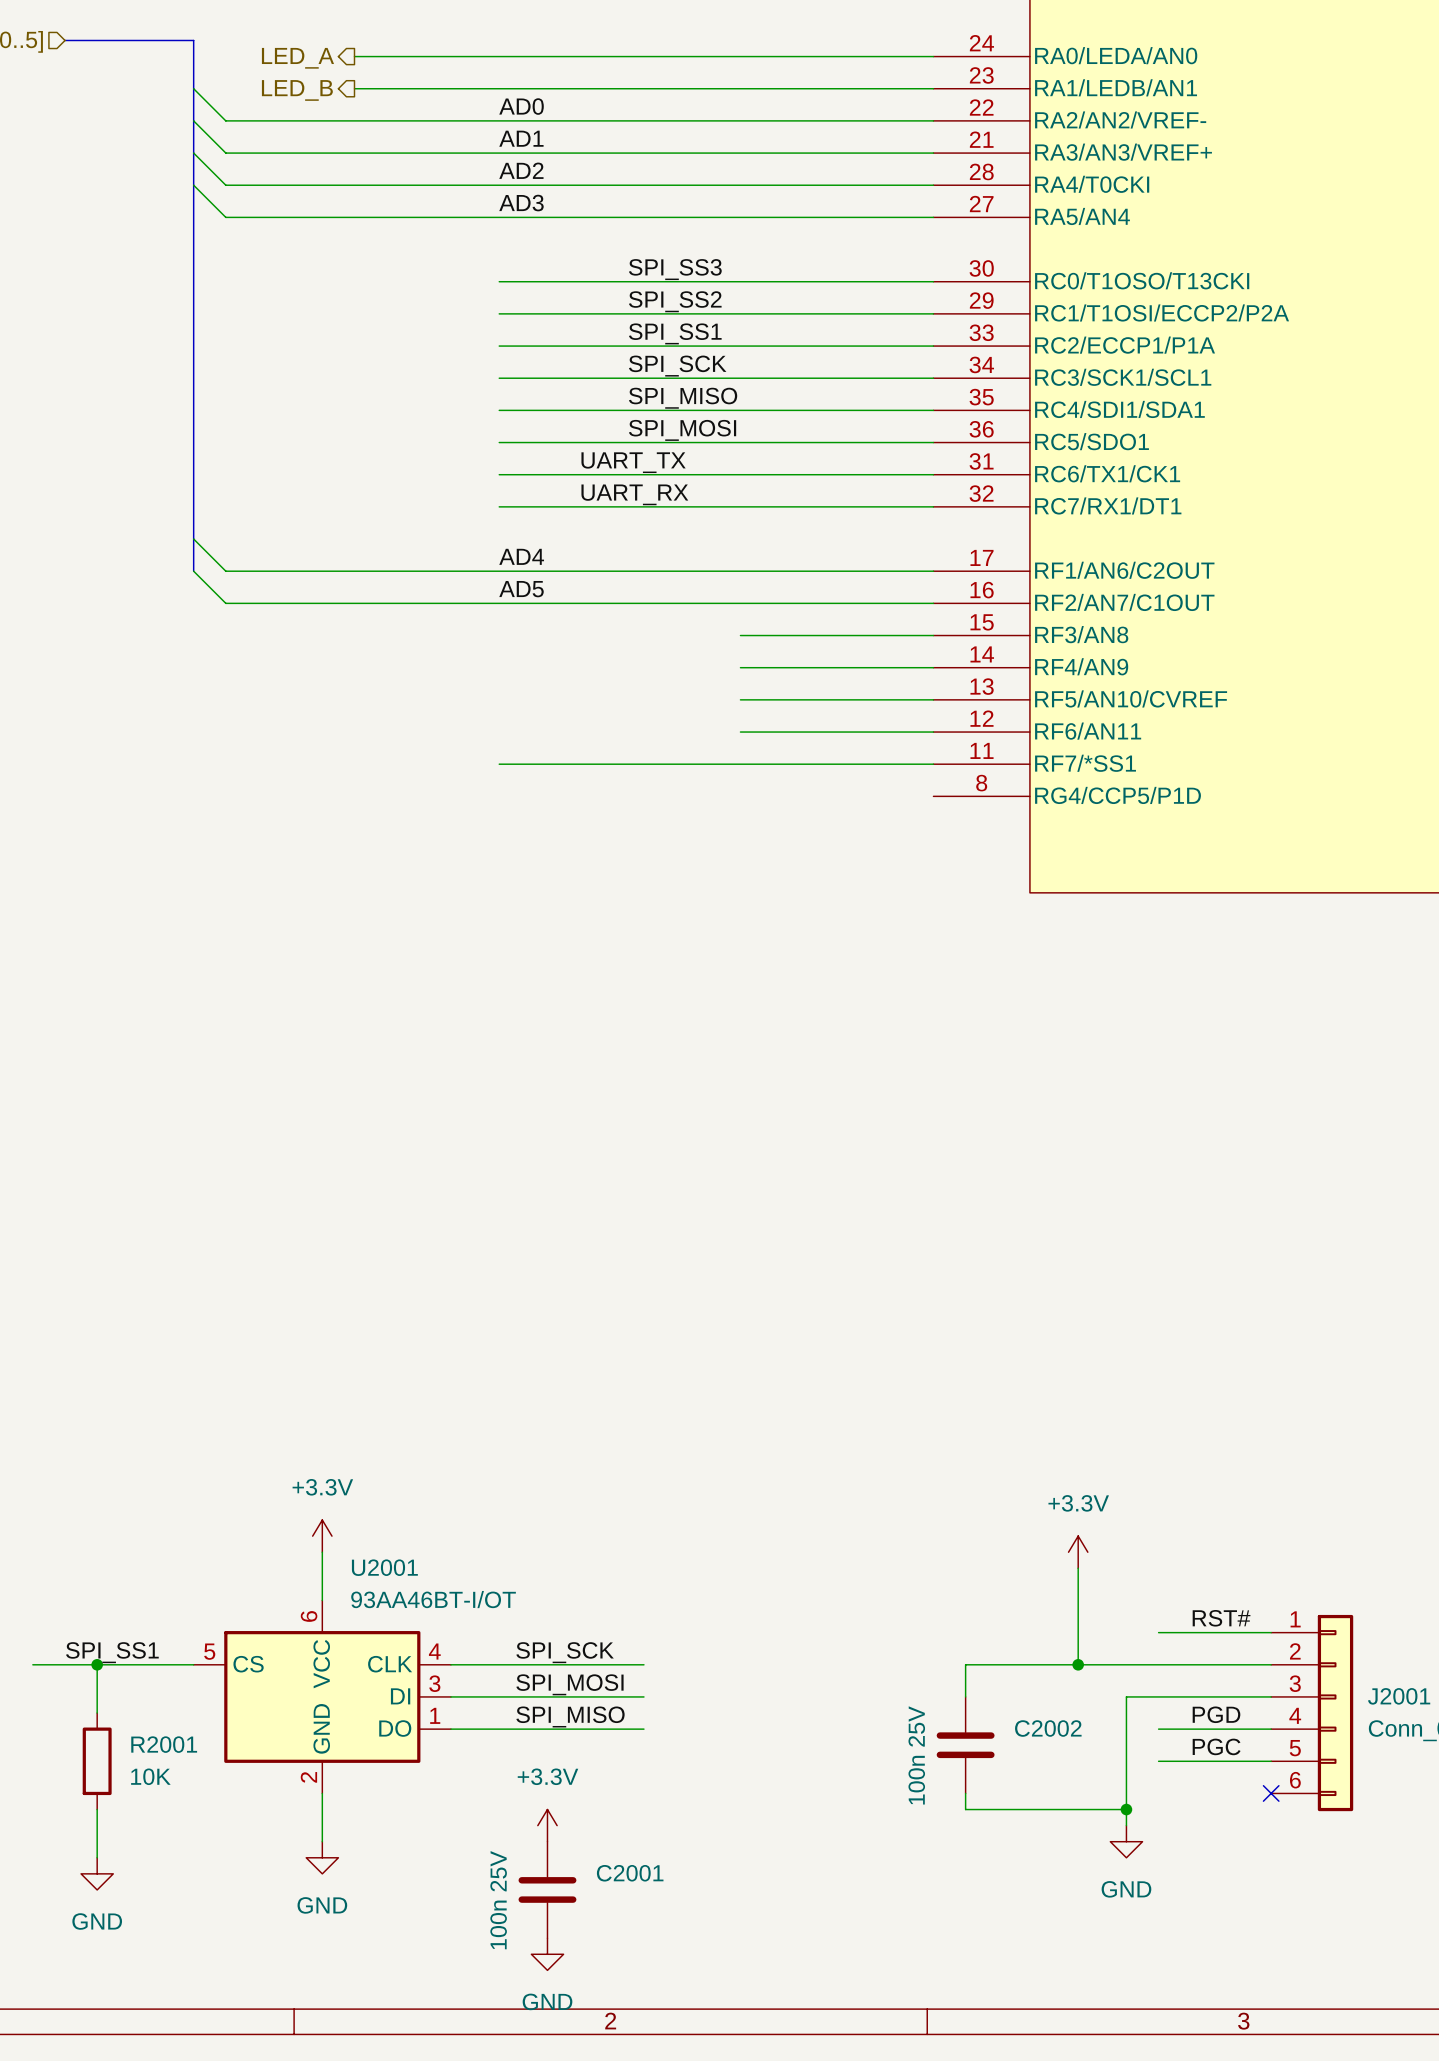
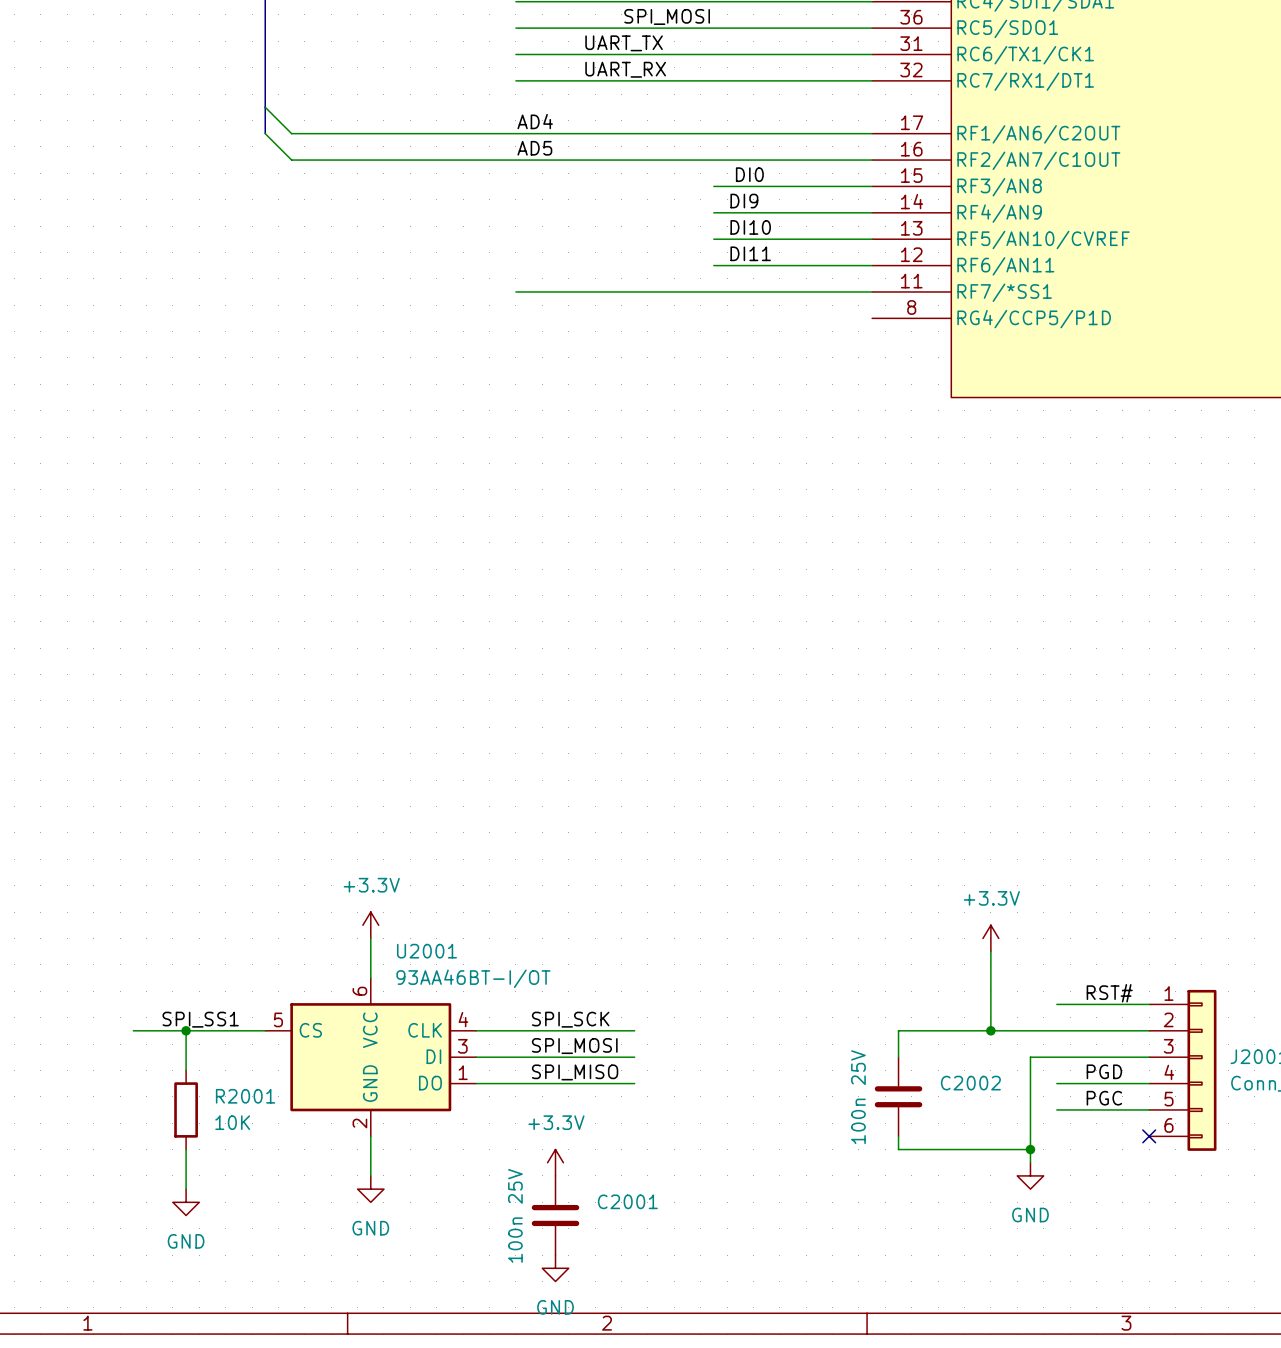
label: none -> DI0 (749, 174)
label: none -> DI9 (744, 201)
label: none -> DI10 (750, 227)
label: none -> DI11 (750, 253)

